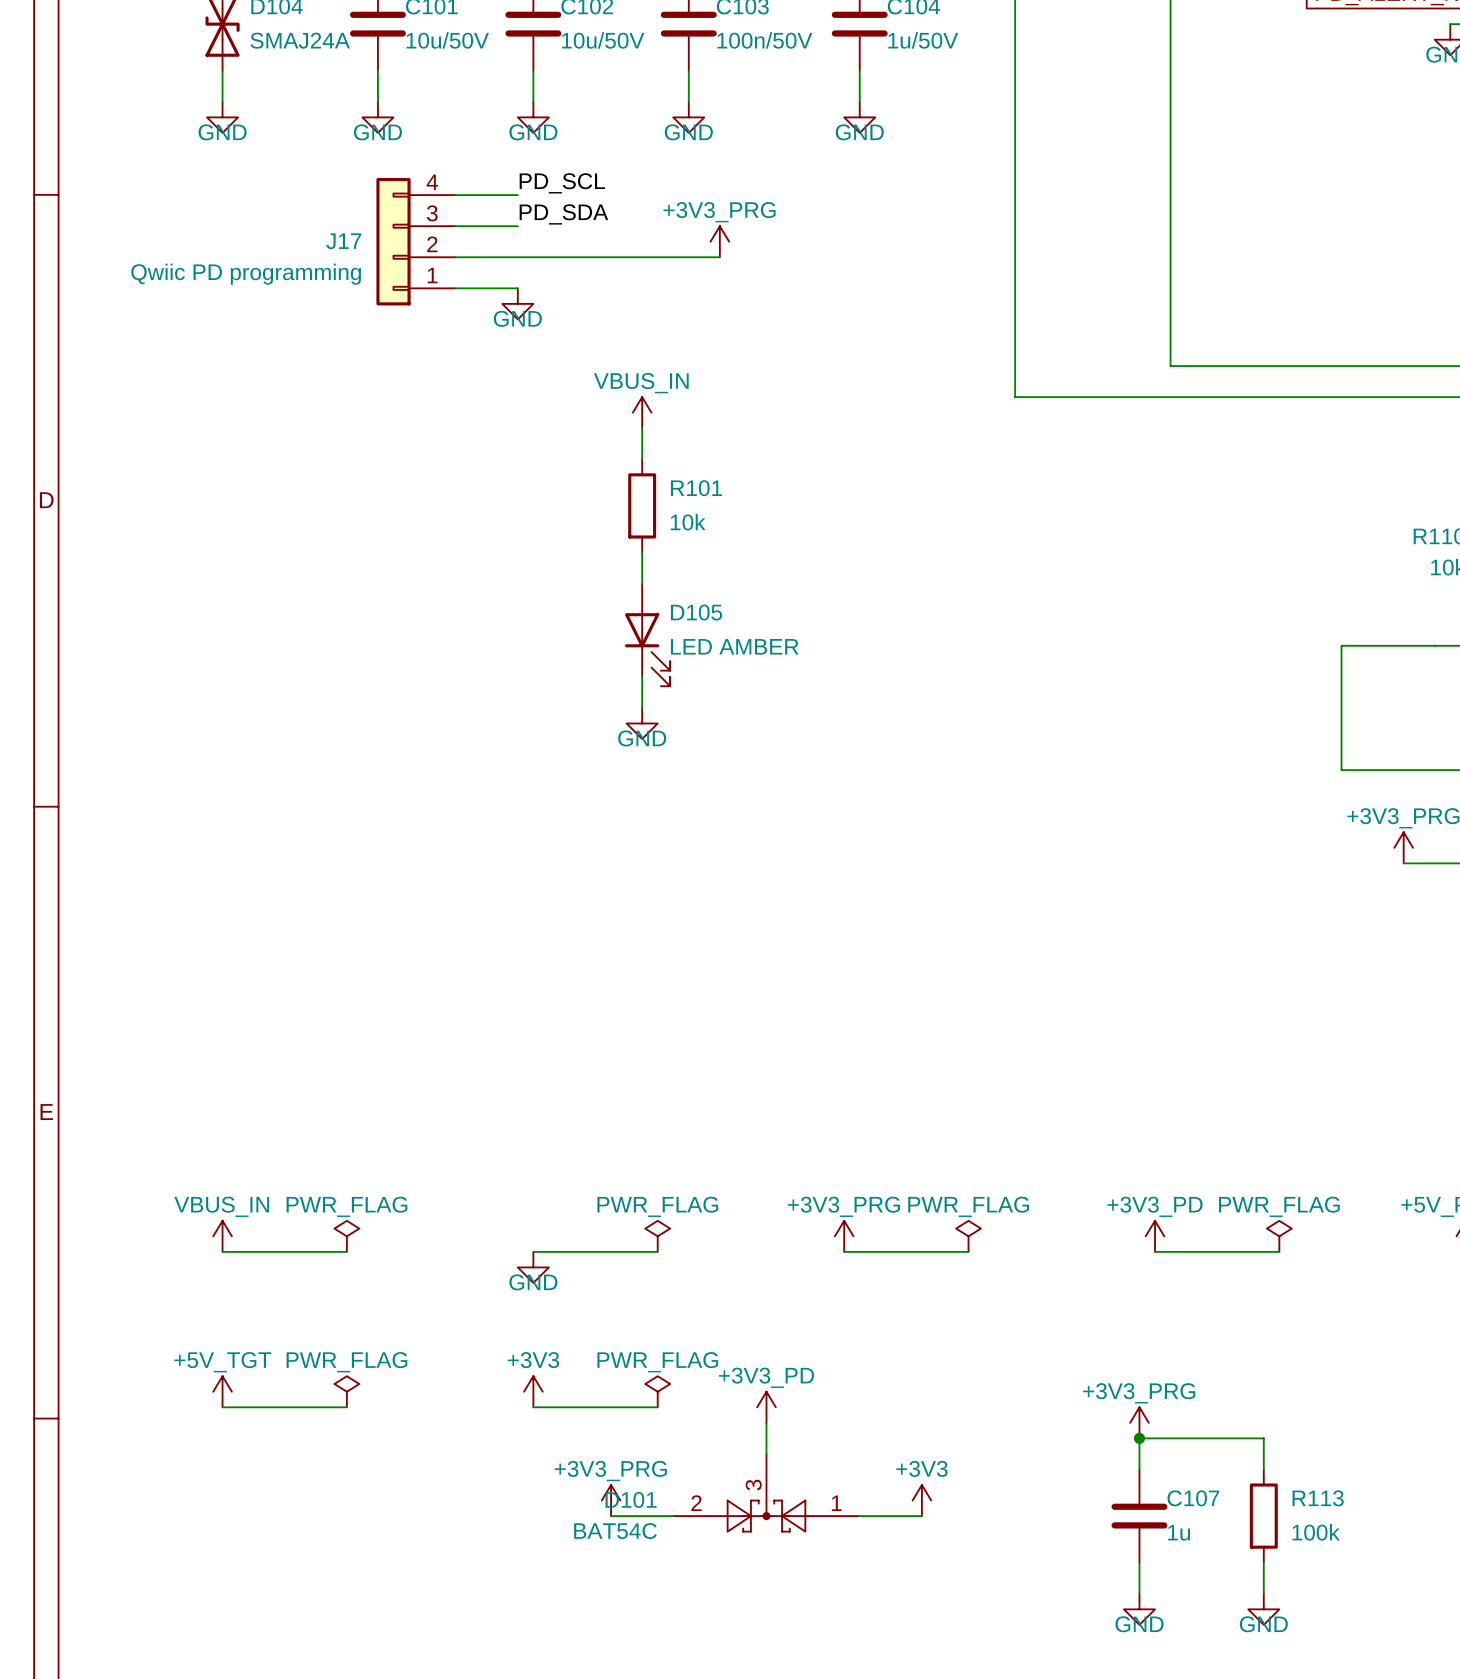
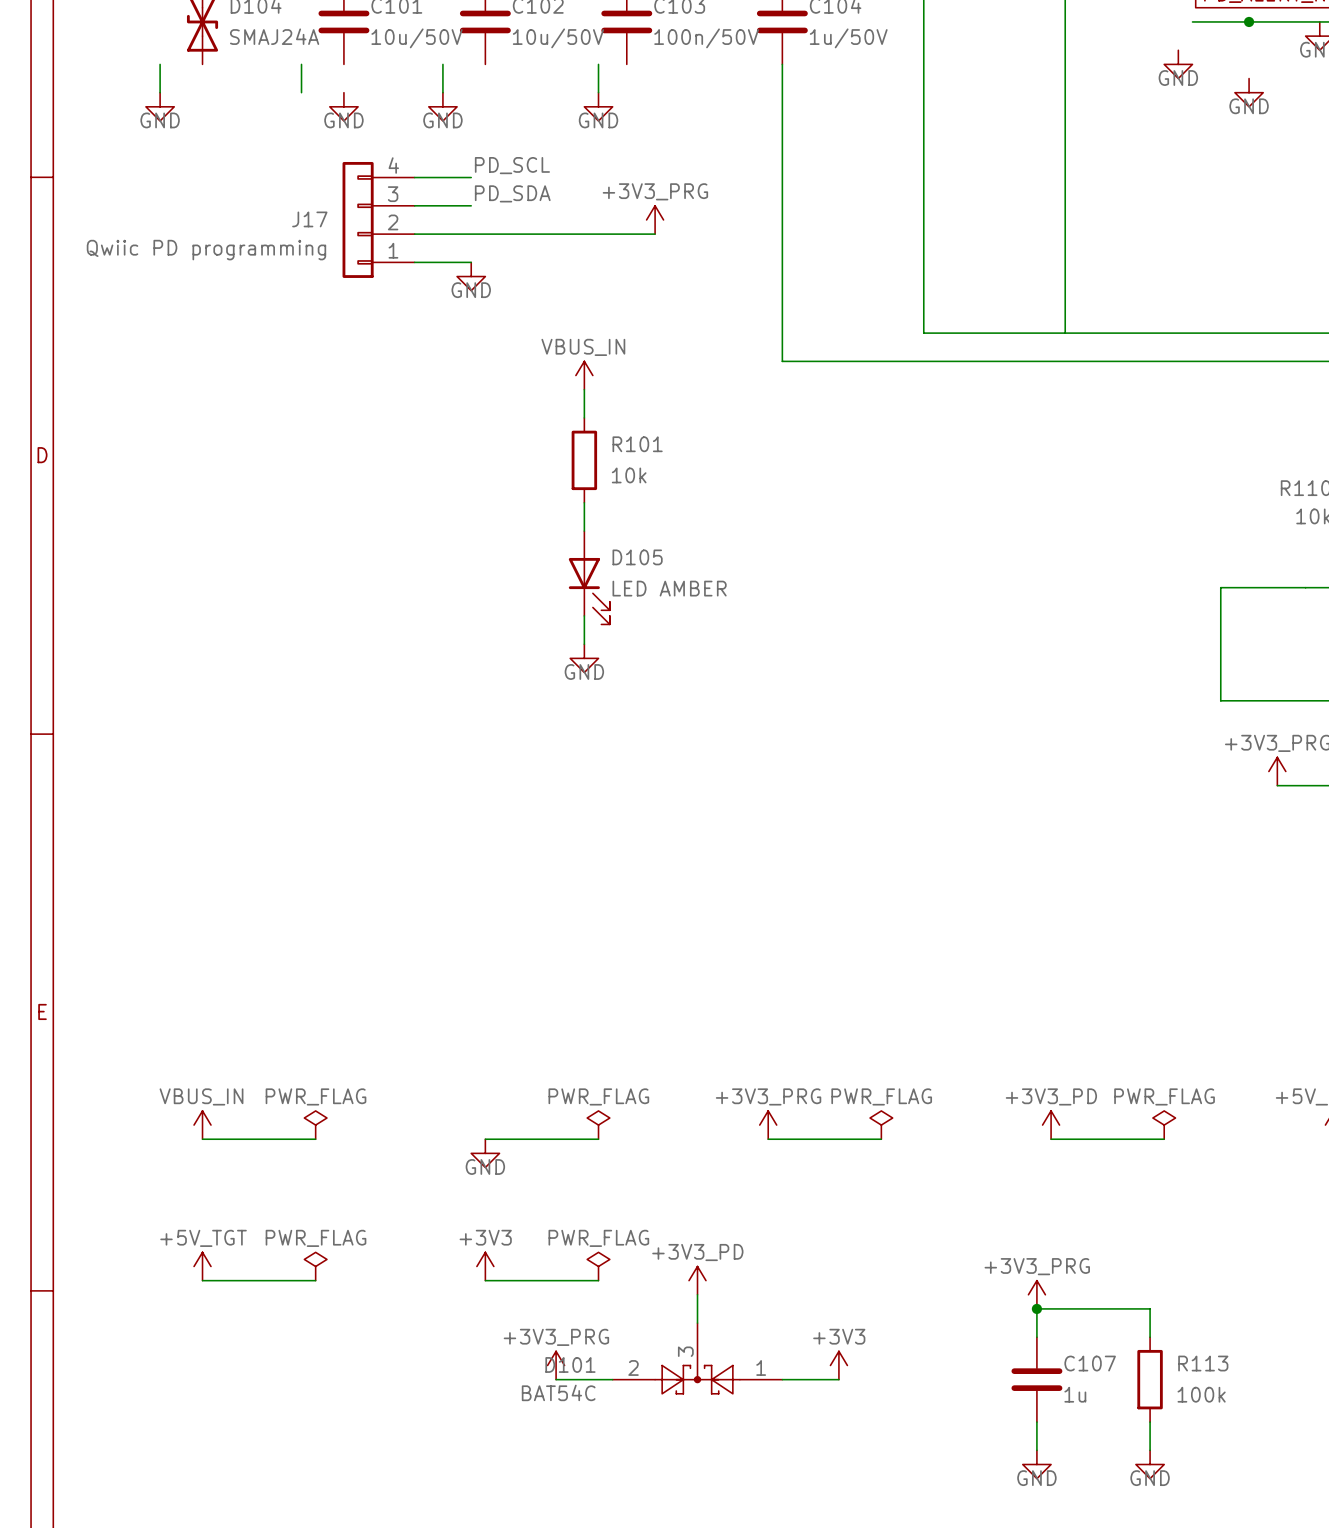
wire: none -> (1192, 21) (1319, 21)
junction: none -> (1249, 21)
wire: (222, 70) (222, 101) -> (160, 64) (160, 92)
wire: (377, 70) (377, 101) -> (301, 64) (301, 92)
wire: (533, 70) (533, 101) -> (442, 64) (442, 92)
wire: (688, 70) (688, 101) -> (598, 64) (598, 92)
power symbol: none -> GND (1178, 64)
wire: none -> (782, 92) (782, 361) (923, 361)
power symbol: none -> GND (1249, 92)
power symbol position: GND (222, 117) -> GND (160, 106)
power symbol position: GND (533, 117) -> GND (442, 106)
power symbol position: GND (688, 117) -> GND (598, 106)
power symbol: GND (859, 117) -> none
wire: (1015, 366) (1015, 397) -> (923, 333) (1065, 333)

